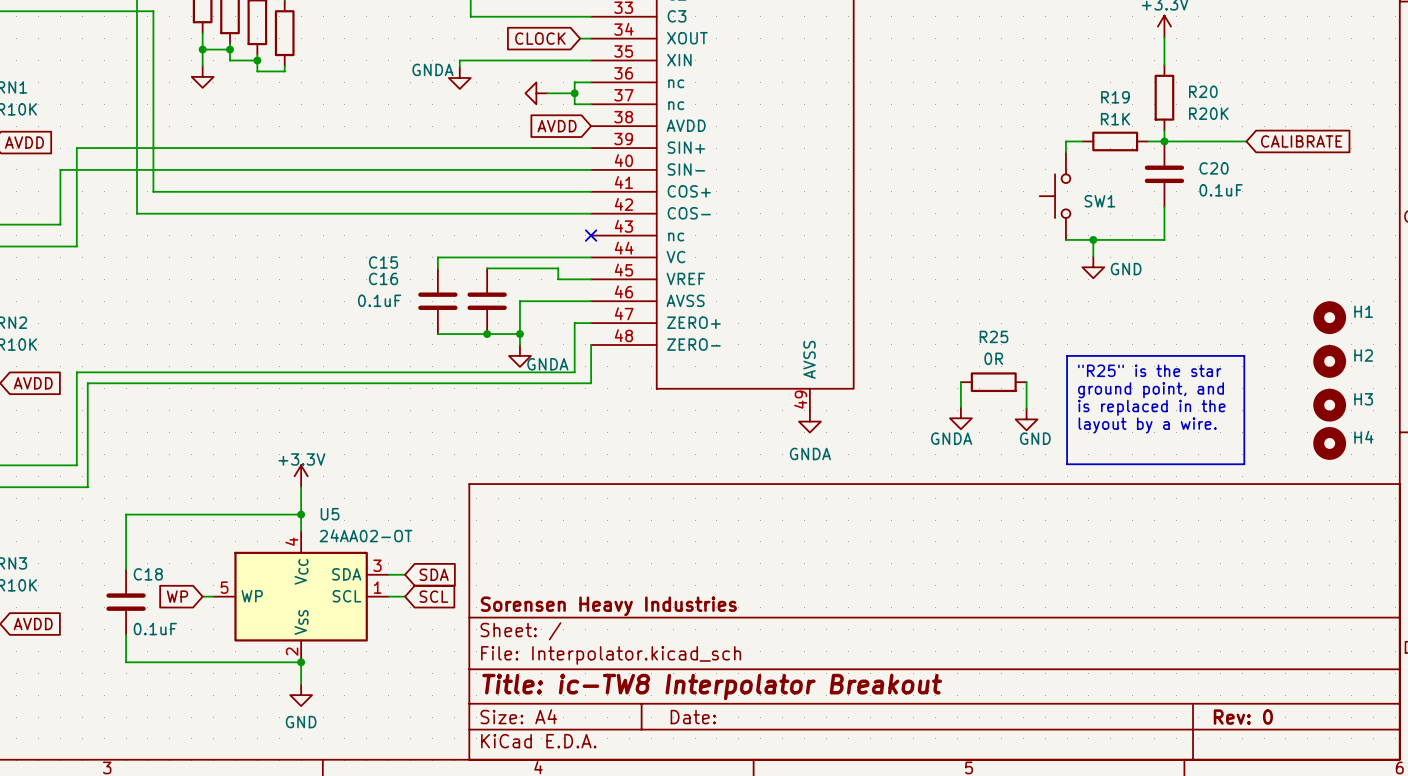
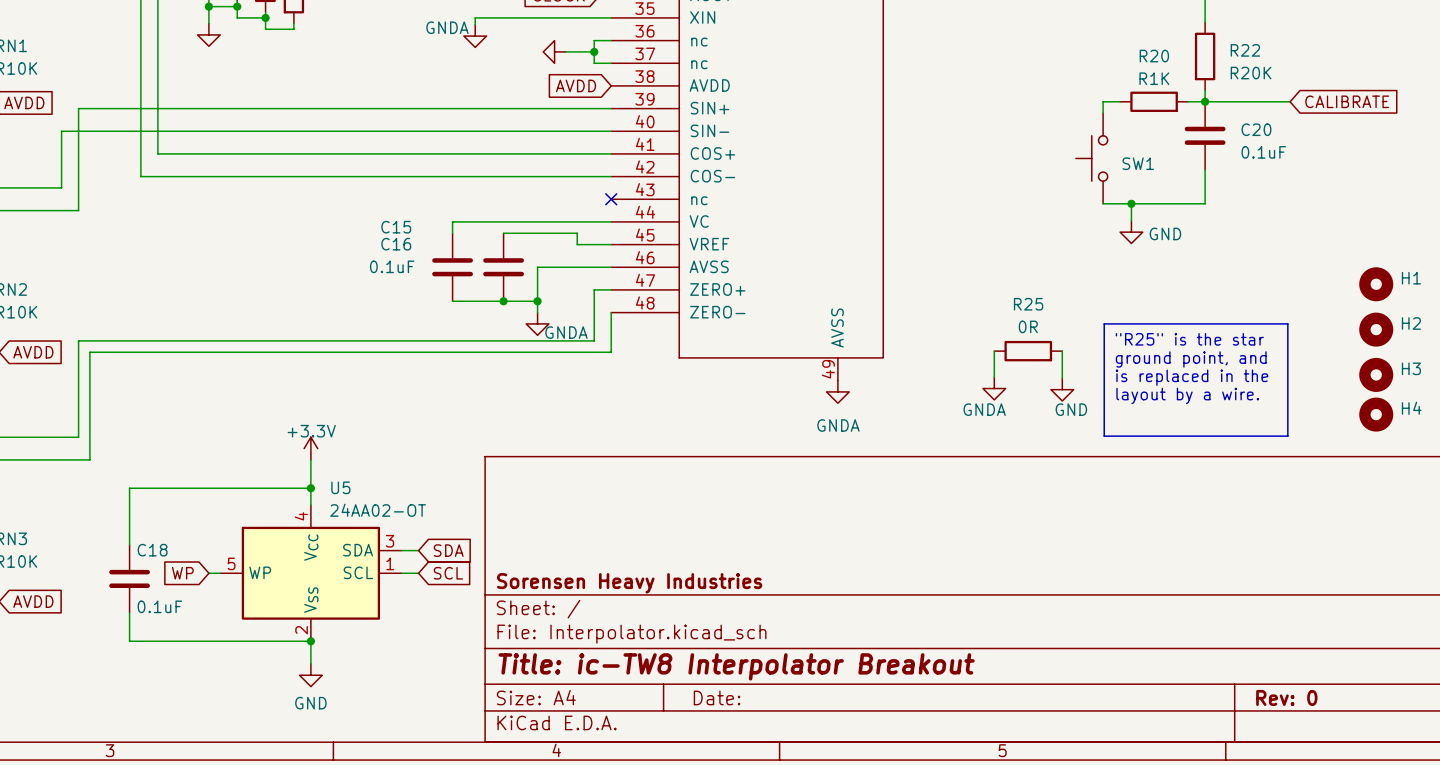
R20 name: R20 (1203, 91) -> R22 (1245, 50)
R19 name: R19 (1115, 97) -> R20 (1154, 56)

